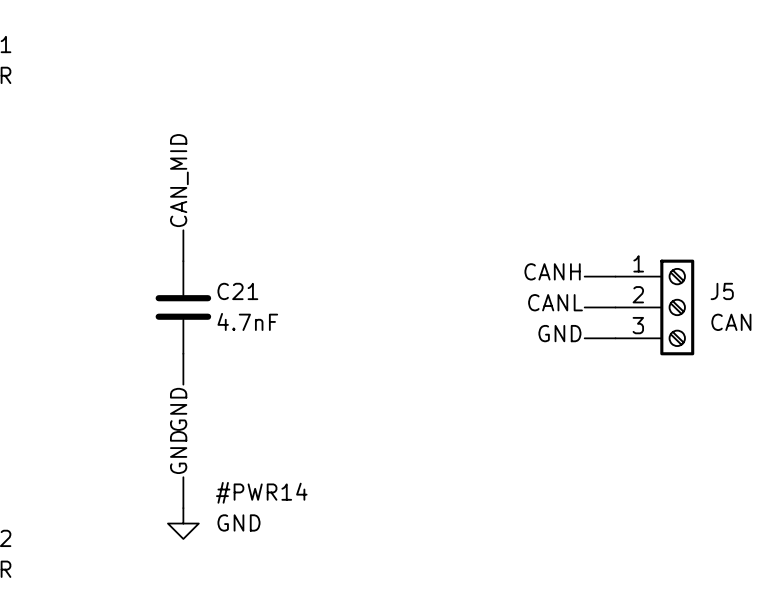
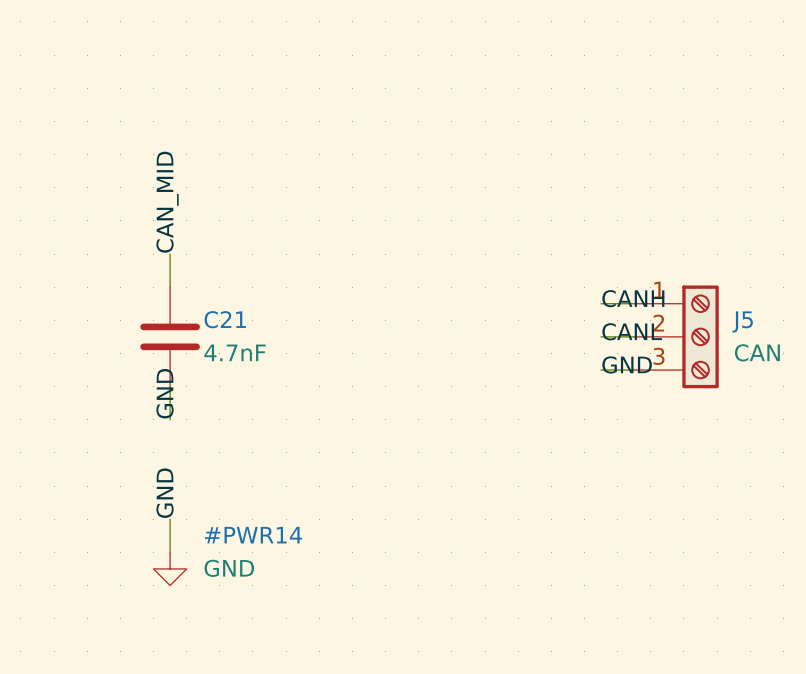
label position: CANH (552, 271) -> CANH (633, 298)
label position: CANL (555, 302) -> CANL (632, 331)
label position: GND (559, 333) -> GND (627, 364)
label position: GND (178, 409) -> GND (165, 393)

